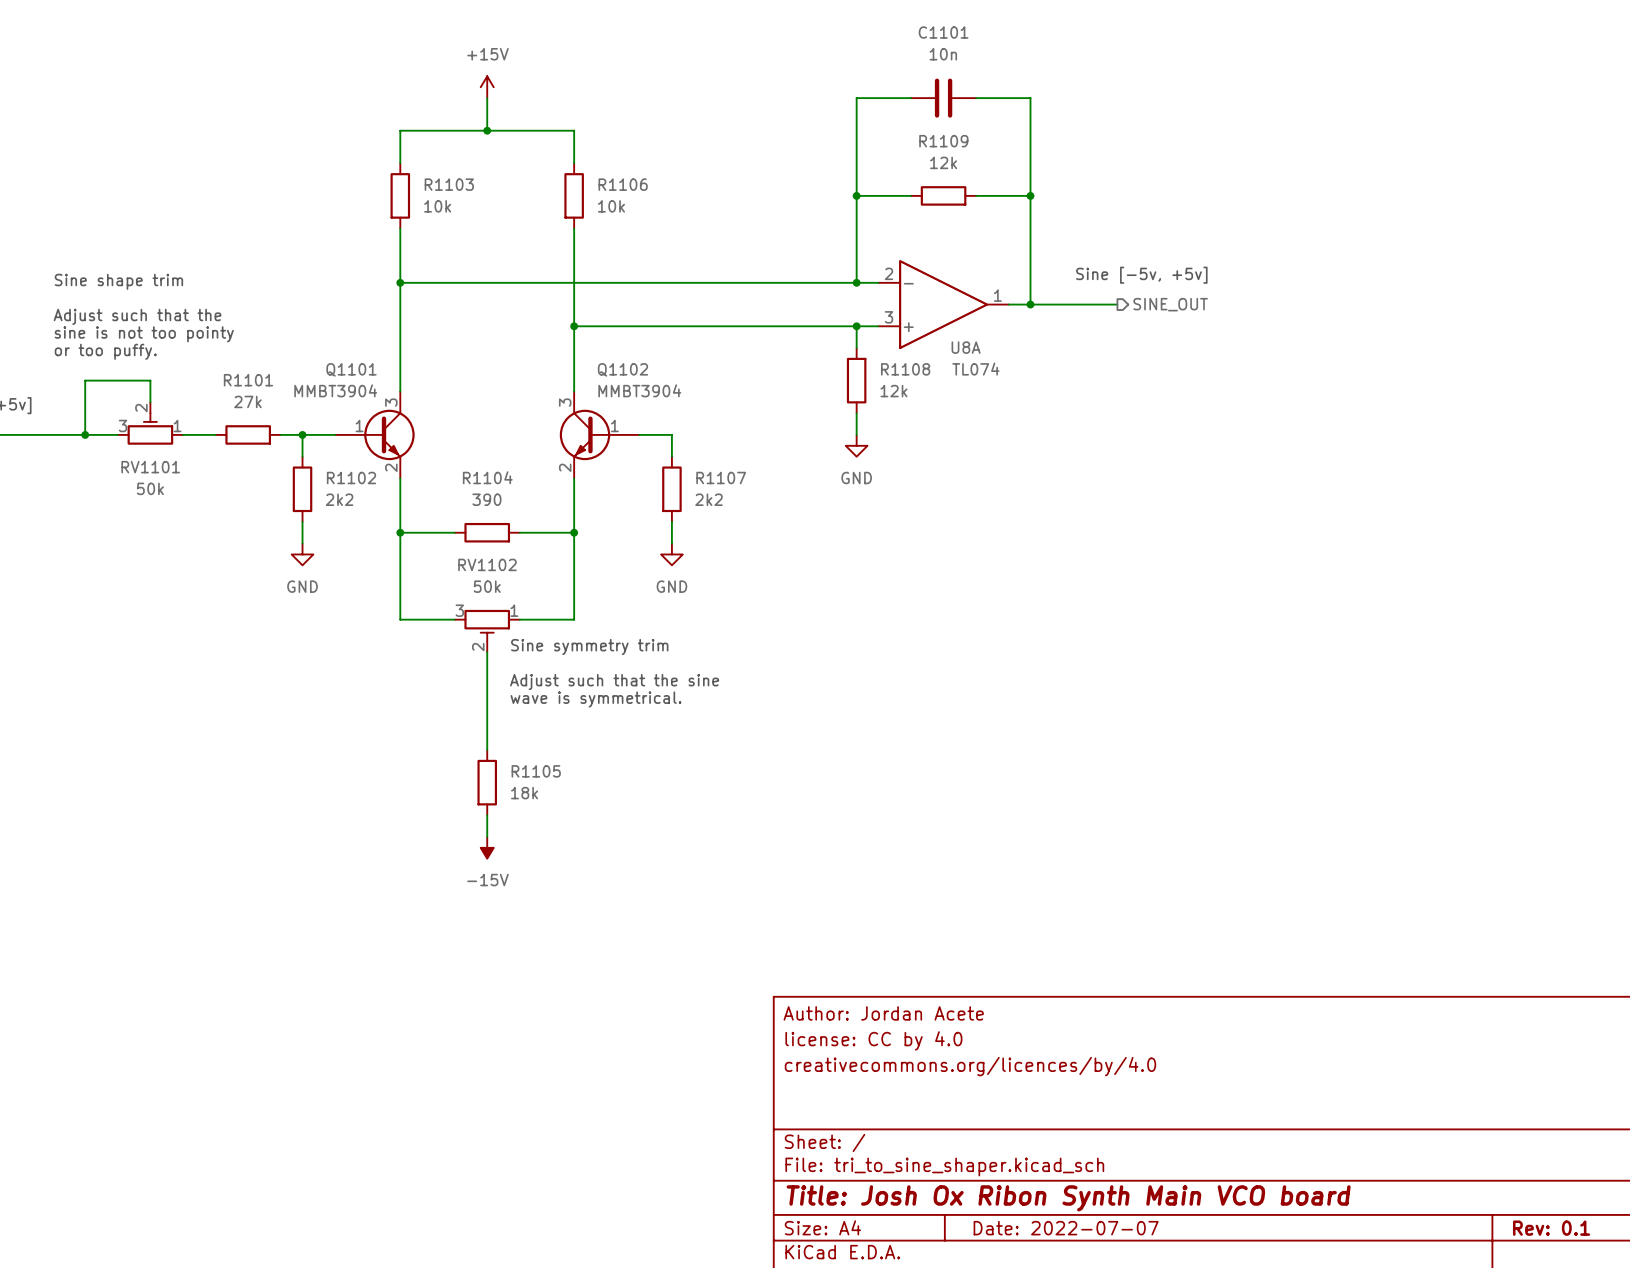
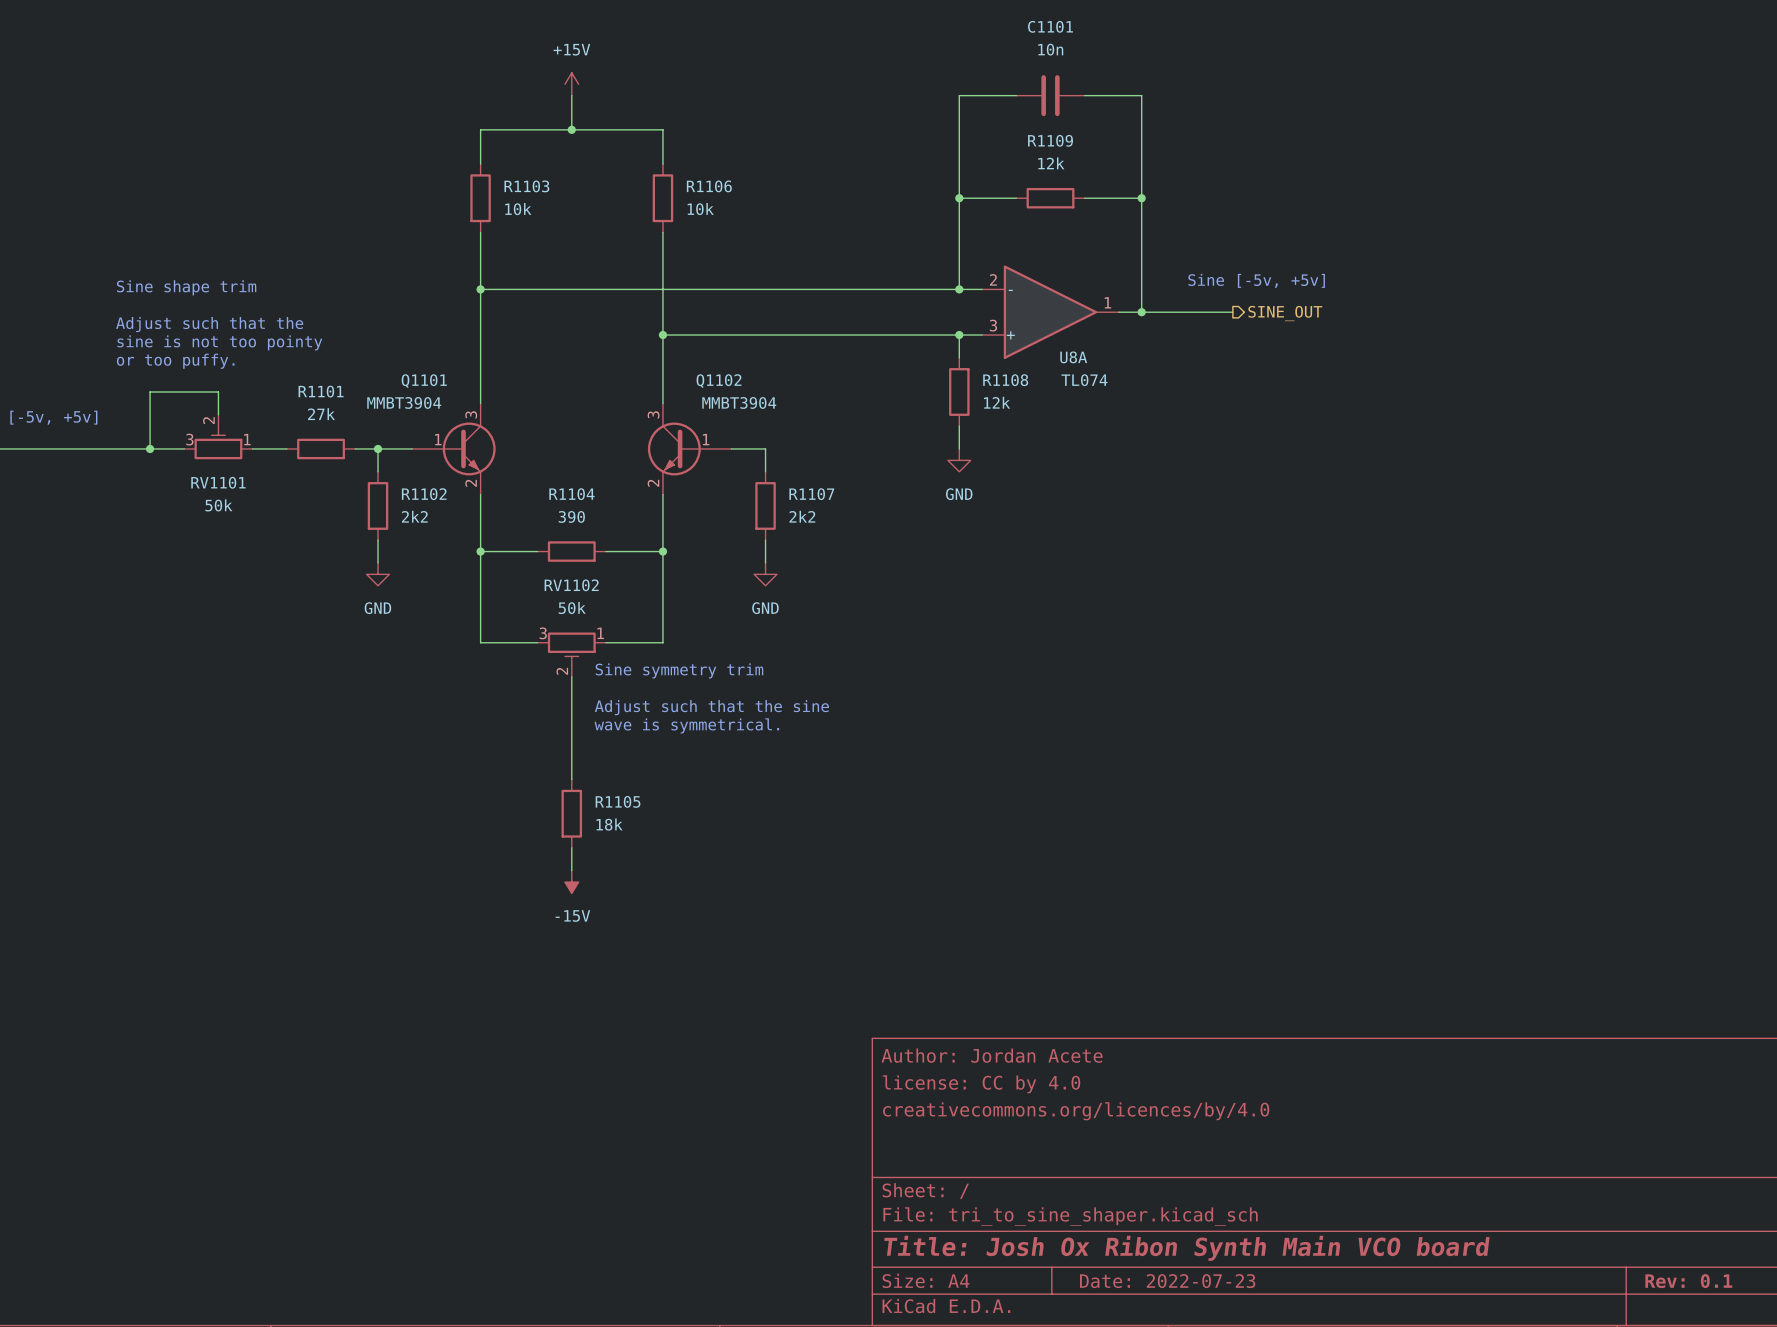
title block: Date: 2022-07-07 (1066, 1228) -> Date: 2022-07-23 (1167, 1281)

